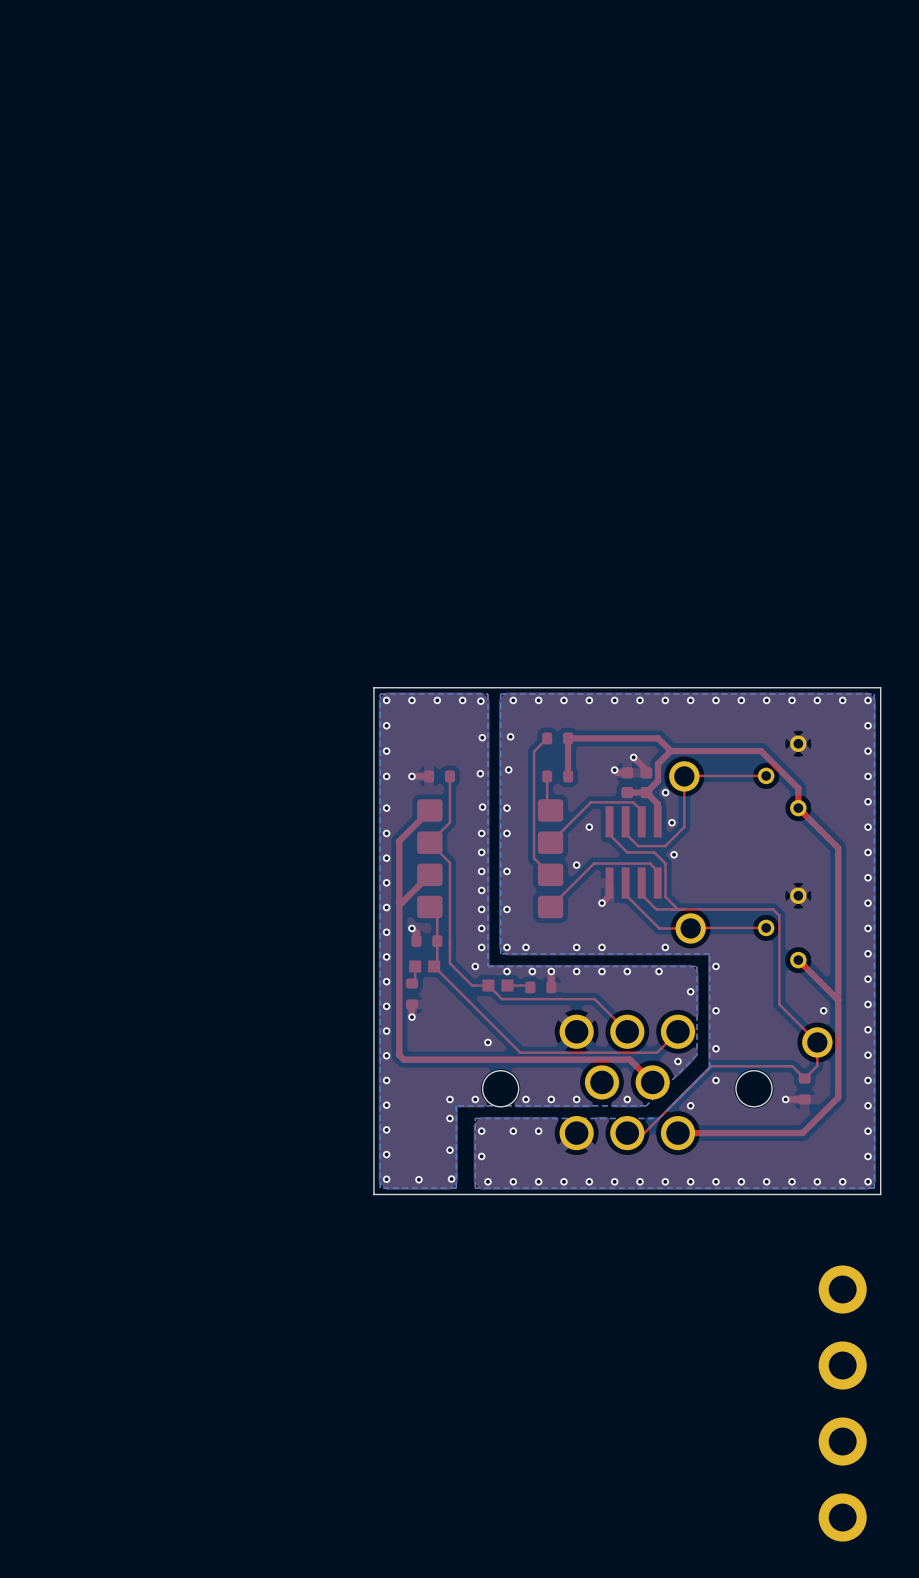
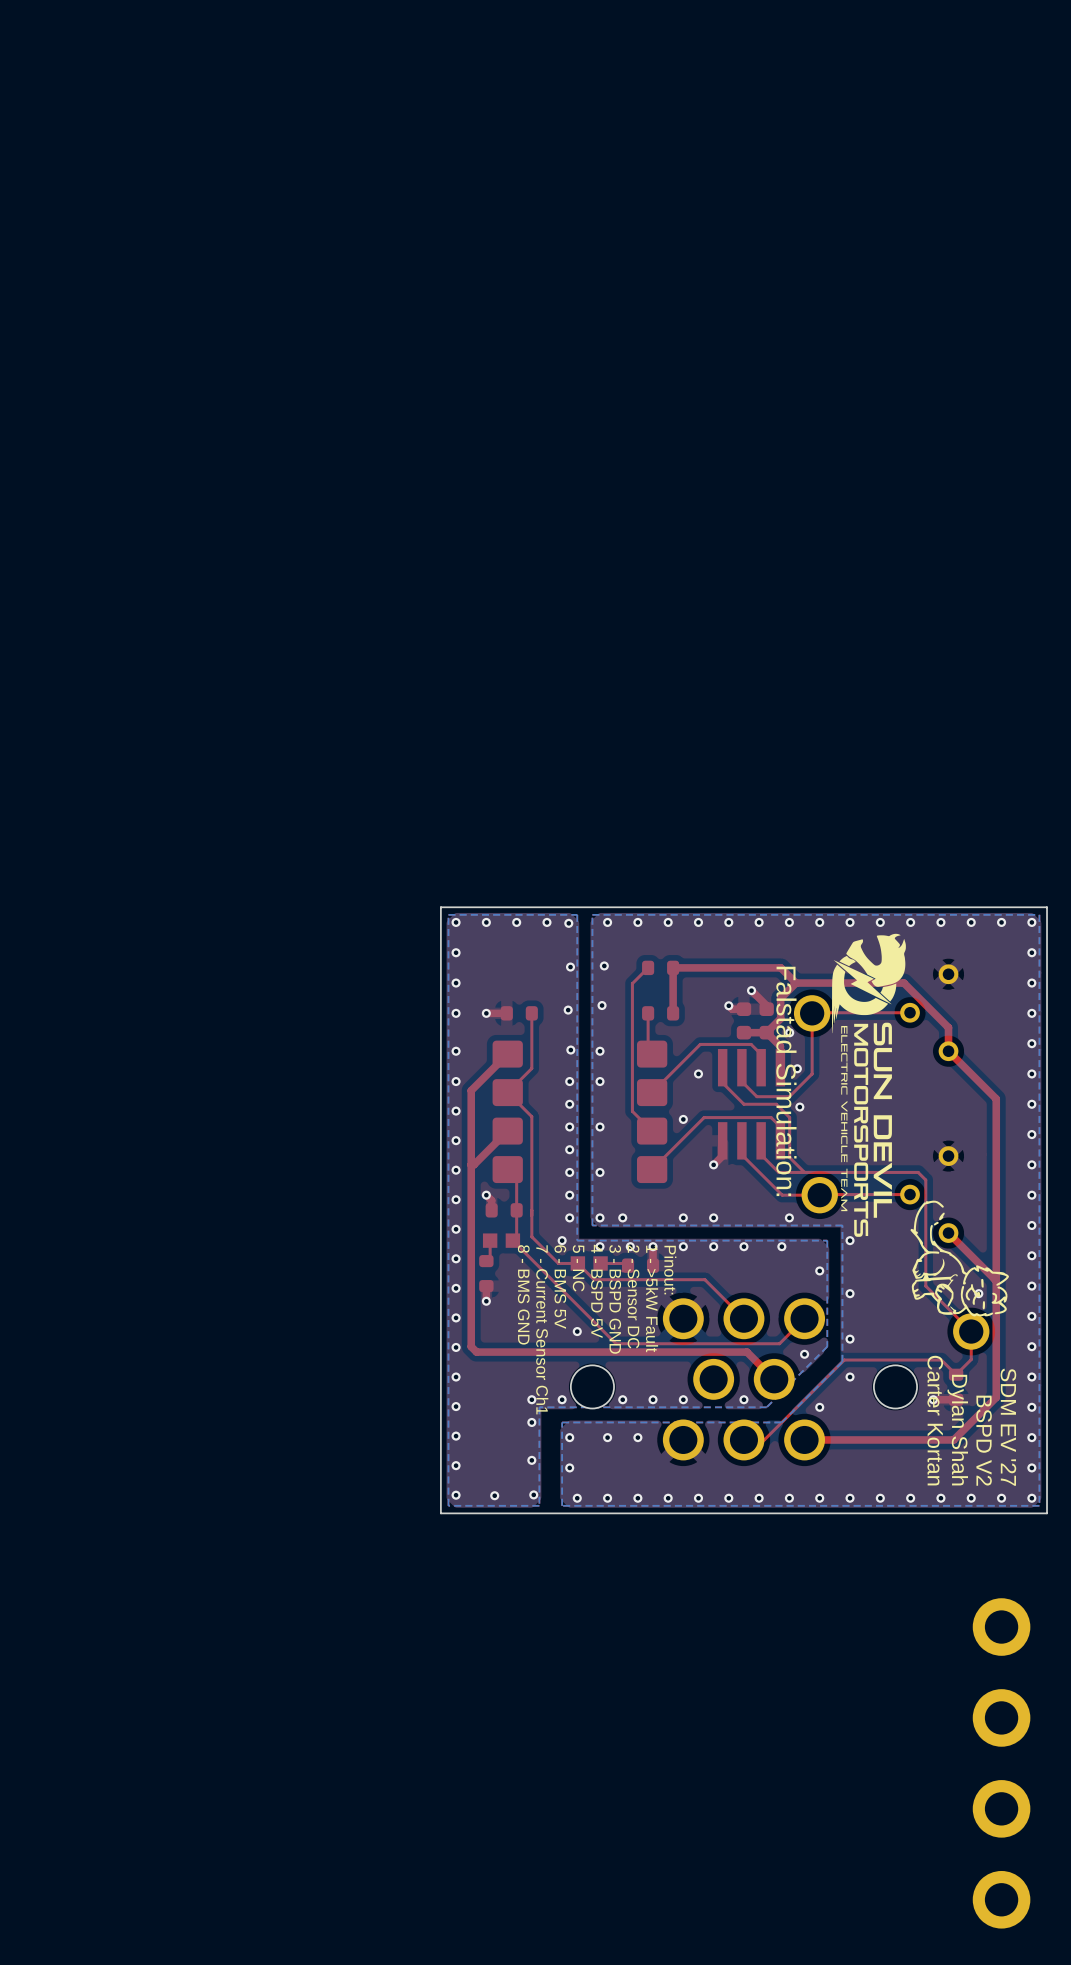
drawing: none -> [832, 933, 1009, 1317]
text: none -> Falstad Simulation: (786, 1081)
text: none -> Pinout: (670, 1270)
text: none -> 5 - NC (578, 1268)
text: none -> 6 - BMS 5V (560, 1287)
text: none -> 8 - BMS GND (523, 1294)
text: none -> 4 - BSPD 5V (596, 1291)
text: none -> 3 - BSPD GND (615, 1299)
text: none -> 2 - Sensor DC (633, 1296)
text: none -> 1 - >5kW Fault (652, 1298)
text: none -> 7 - Current Sensor Ch1 (542, 1329)
text: none -> Carter Kortan (935, 1420)
text: none -> SDM EV '27 (1008, 1427)
text: none -> Dylan Shah (957, 1430)
text: none -> BSPD V2 (984, 1440)

